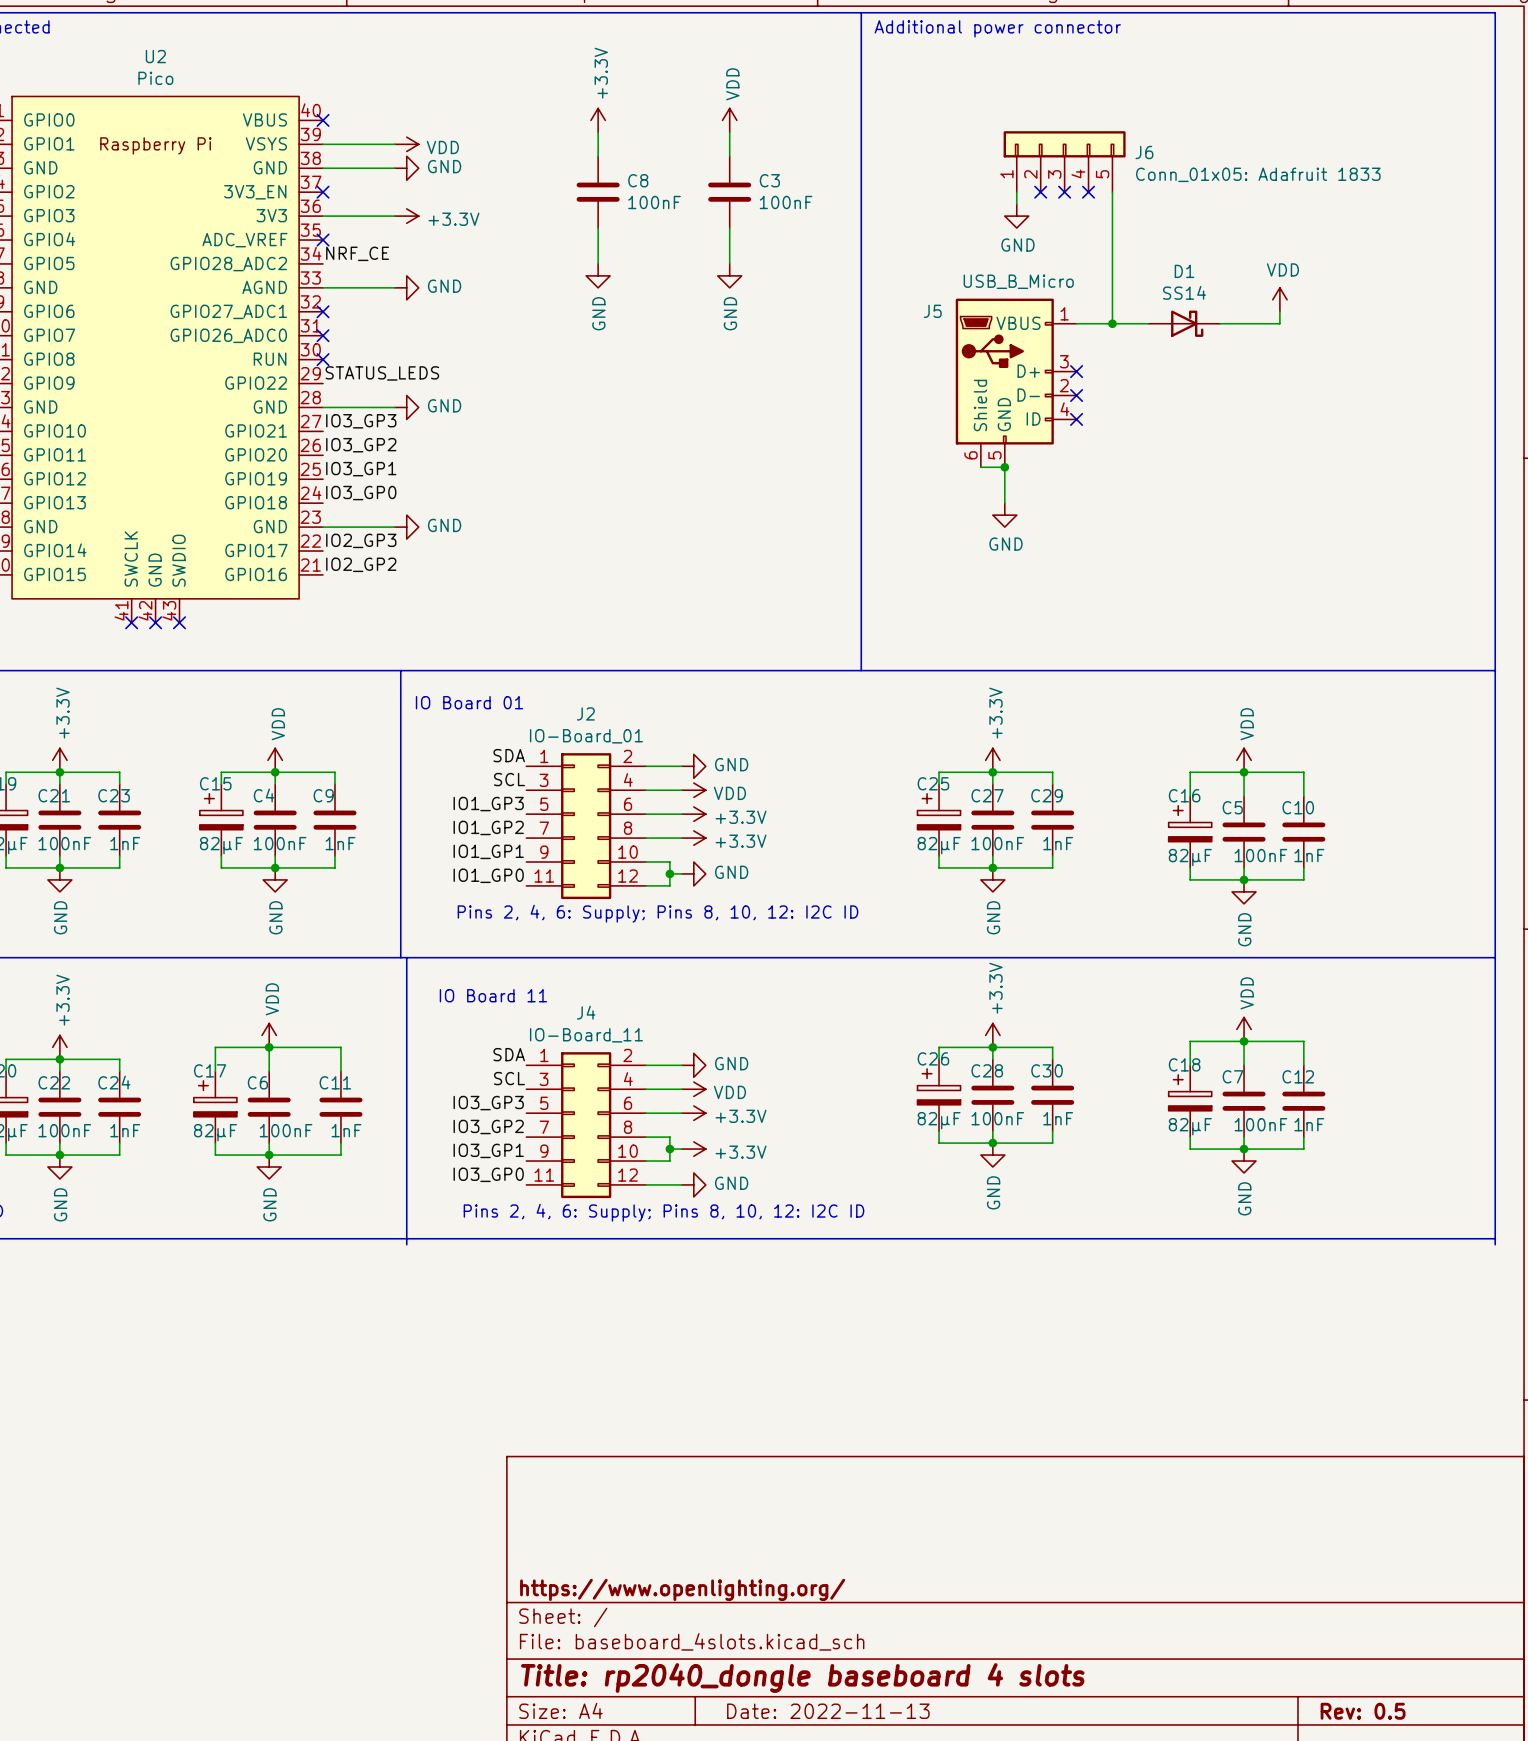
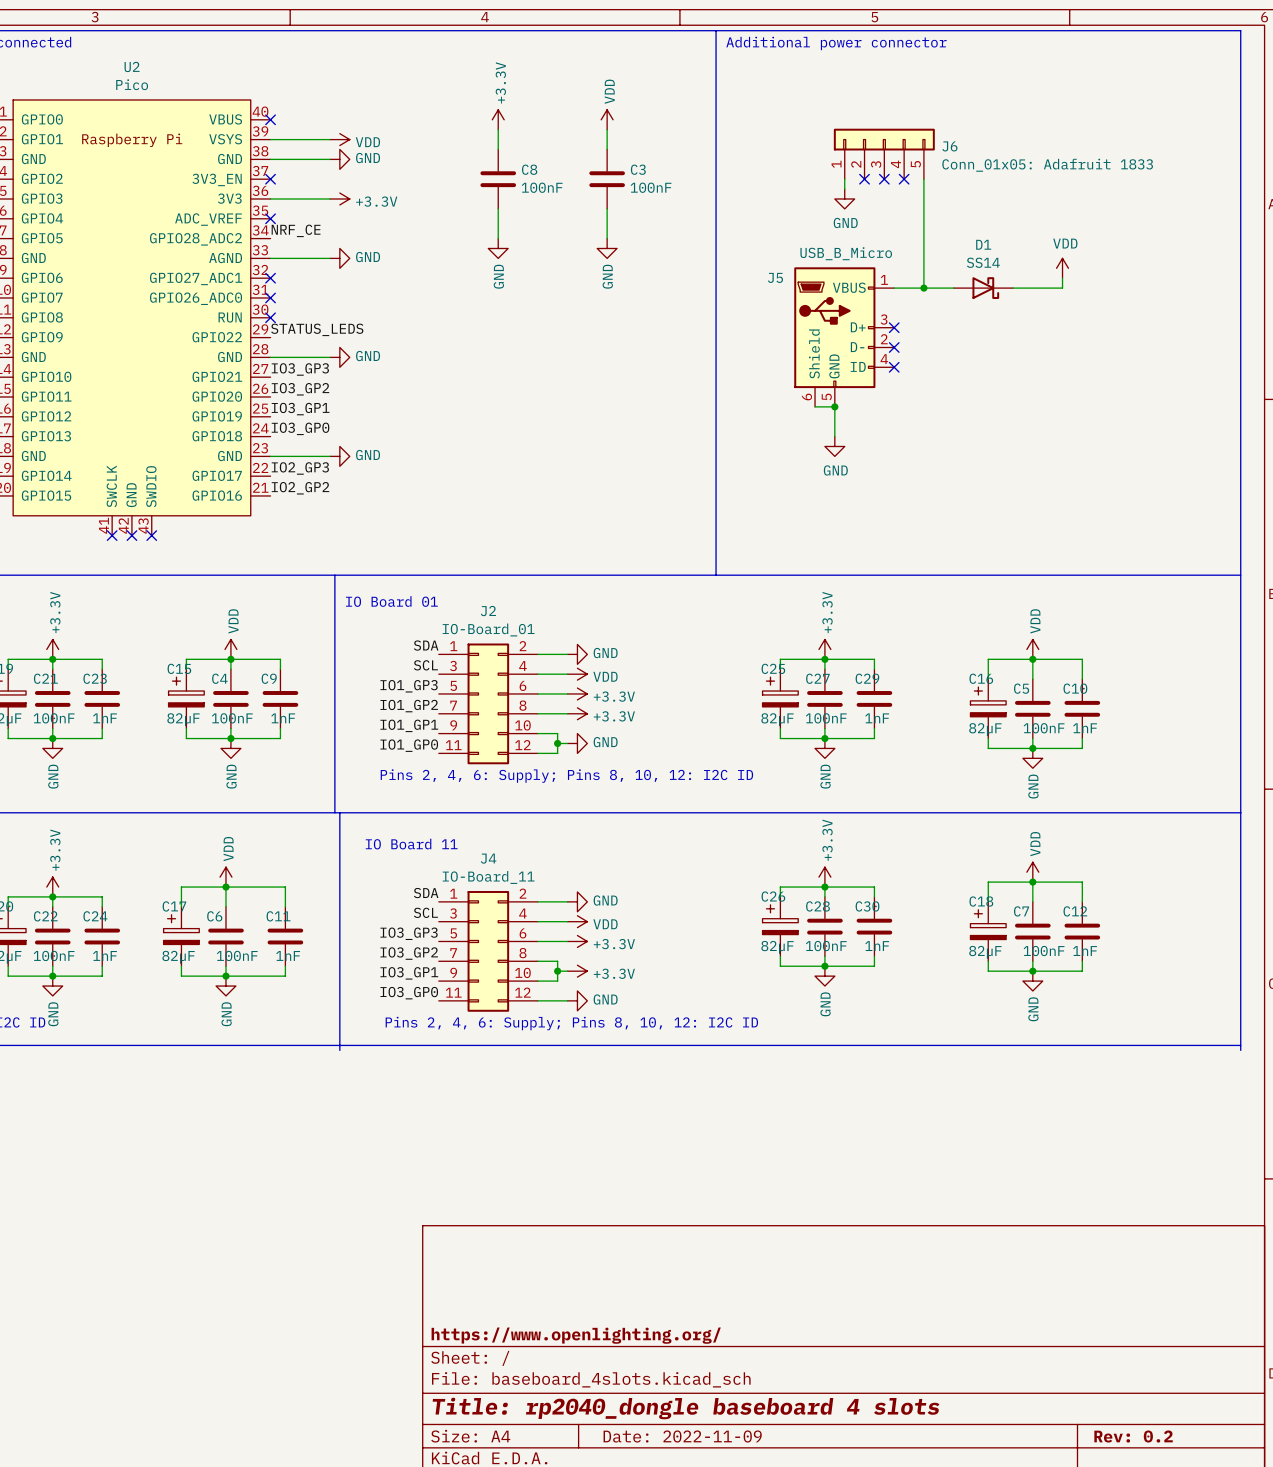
title block: Date: 2022-11-13 (828, 1711) -> Date: 2022-11-09 (682, 1436)
title block: Rev: 0.5 (1363, 1711) -> Rev: 0.2 (1133, 1436)

